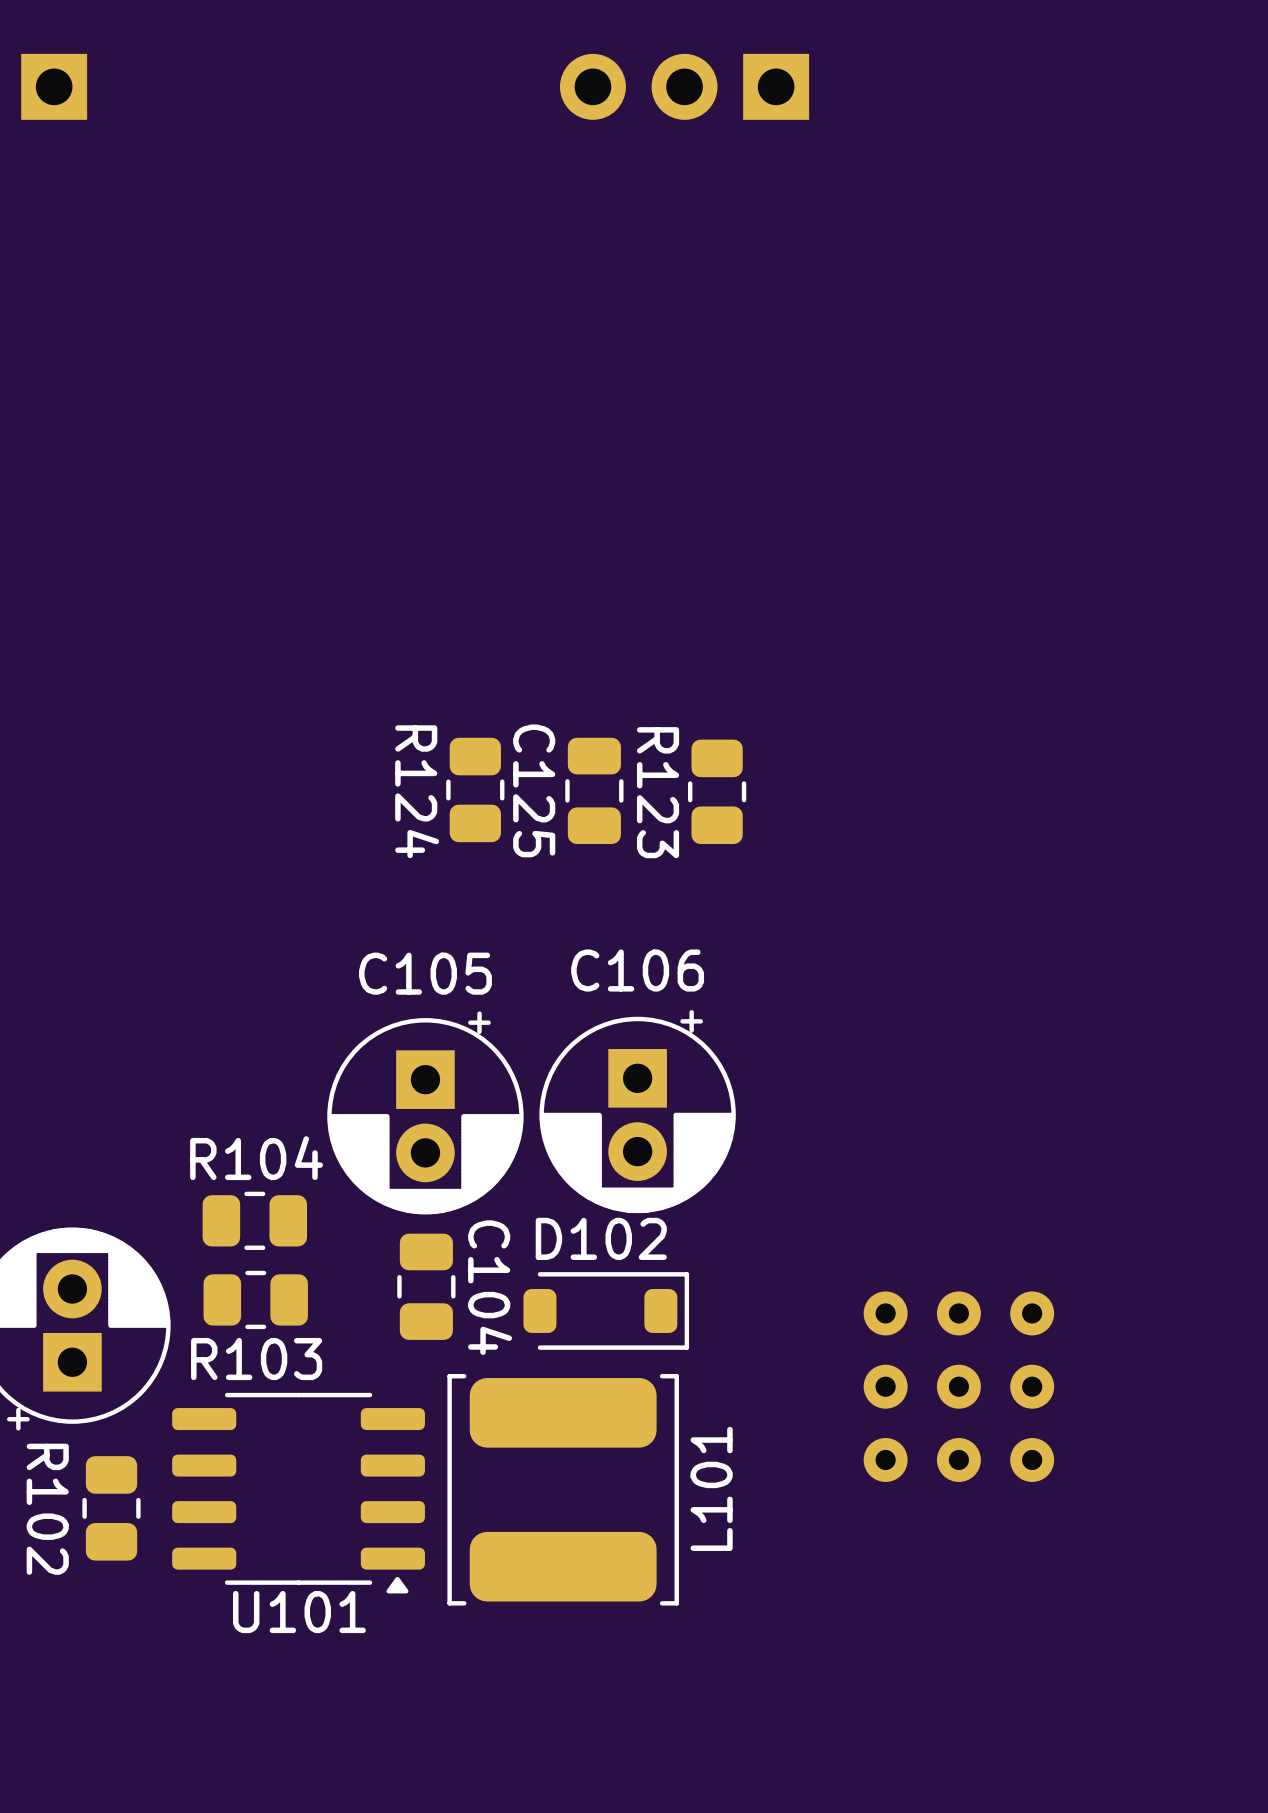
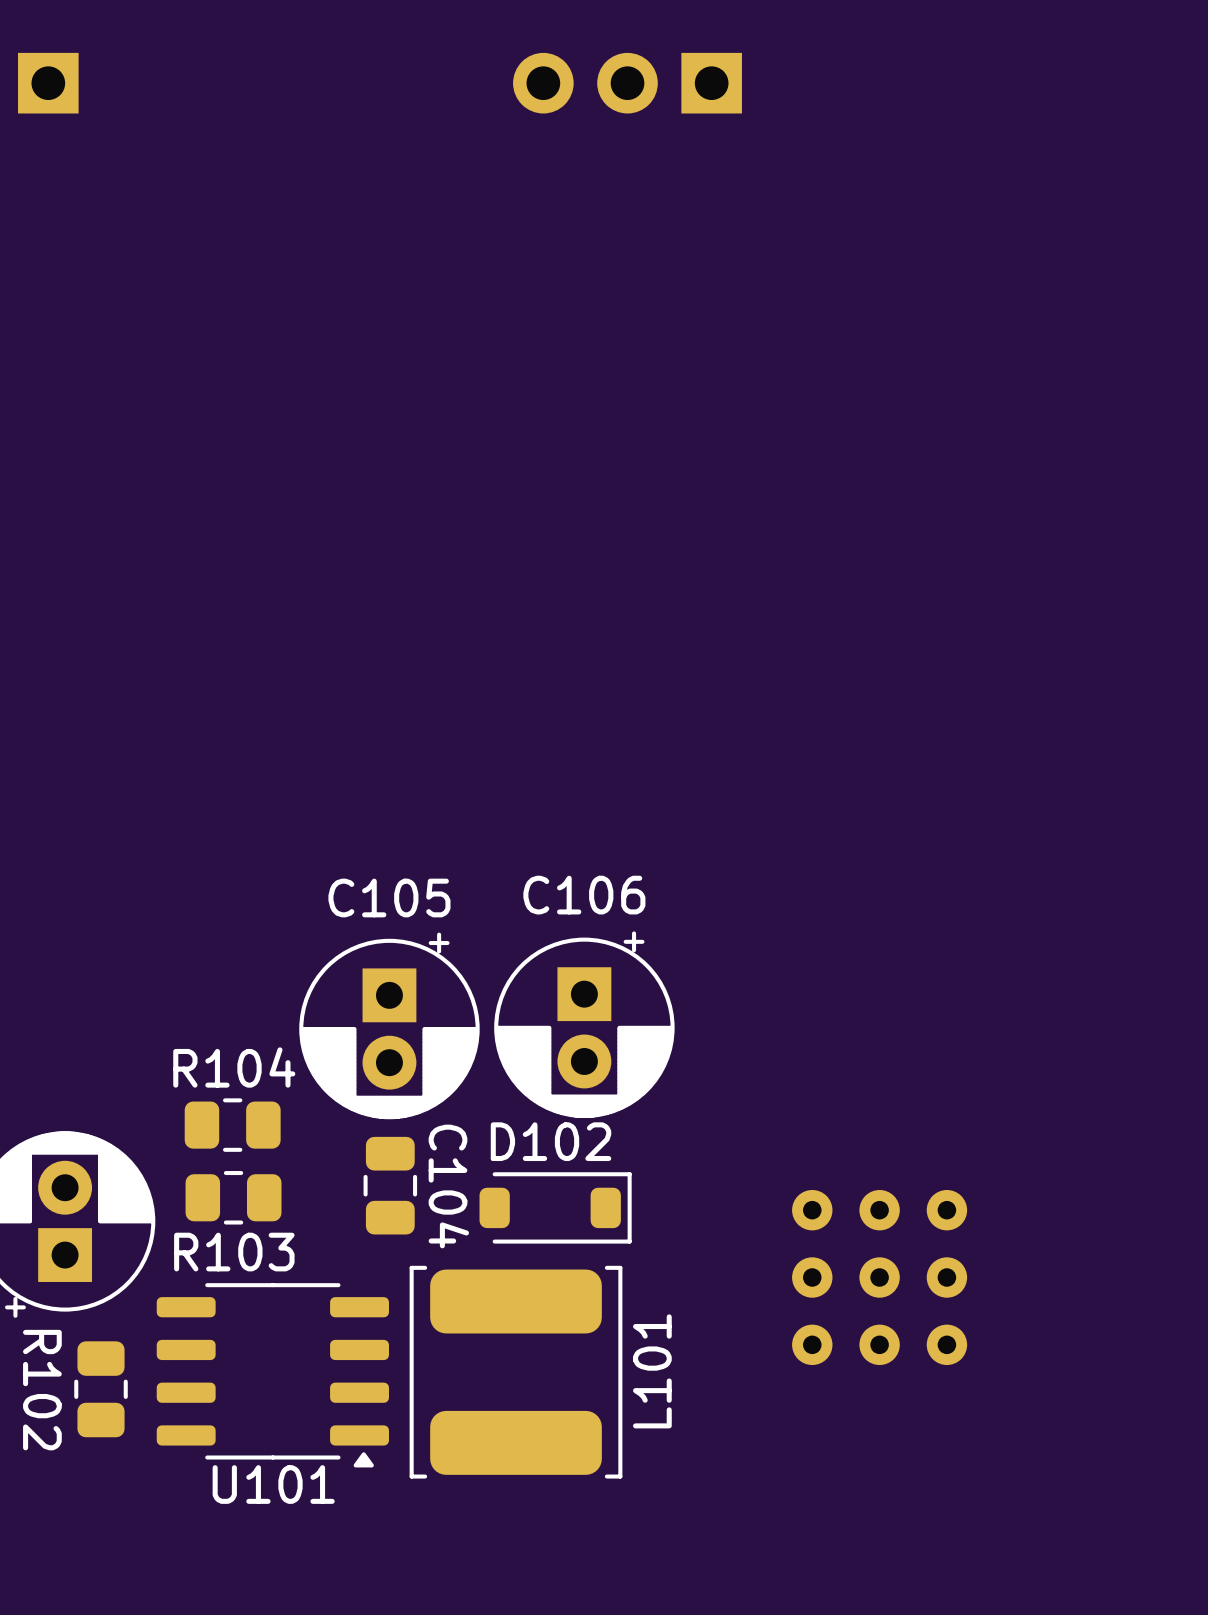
R124: (475, 789) -> none
C125: (594, 790) -> none
R123: (717, 791) -> none

